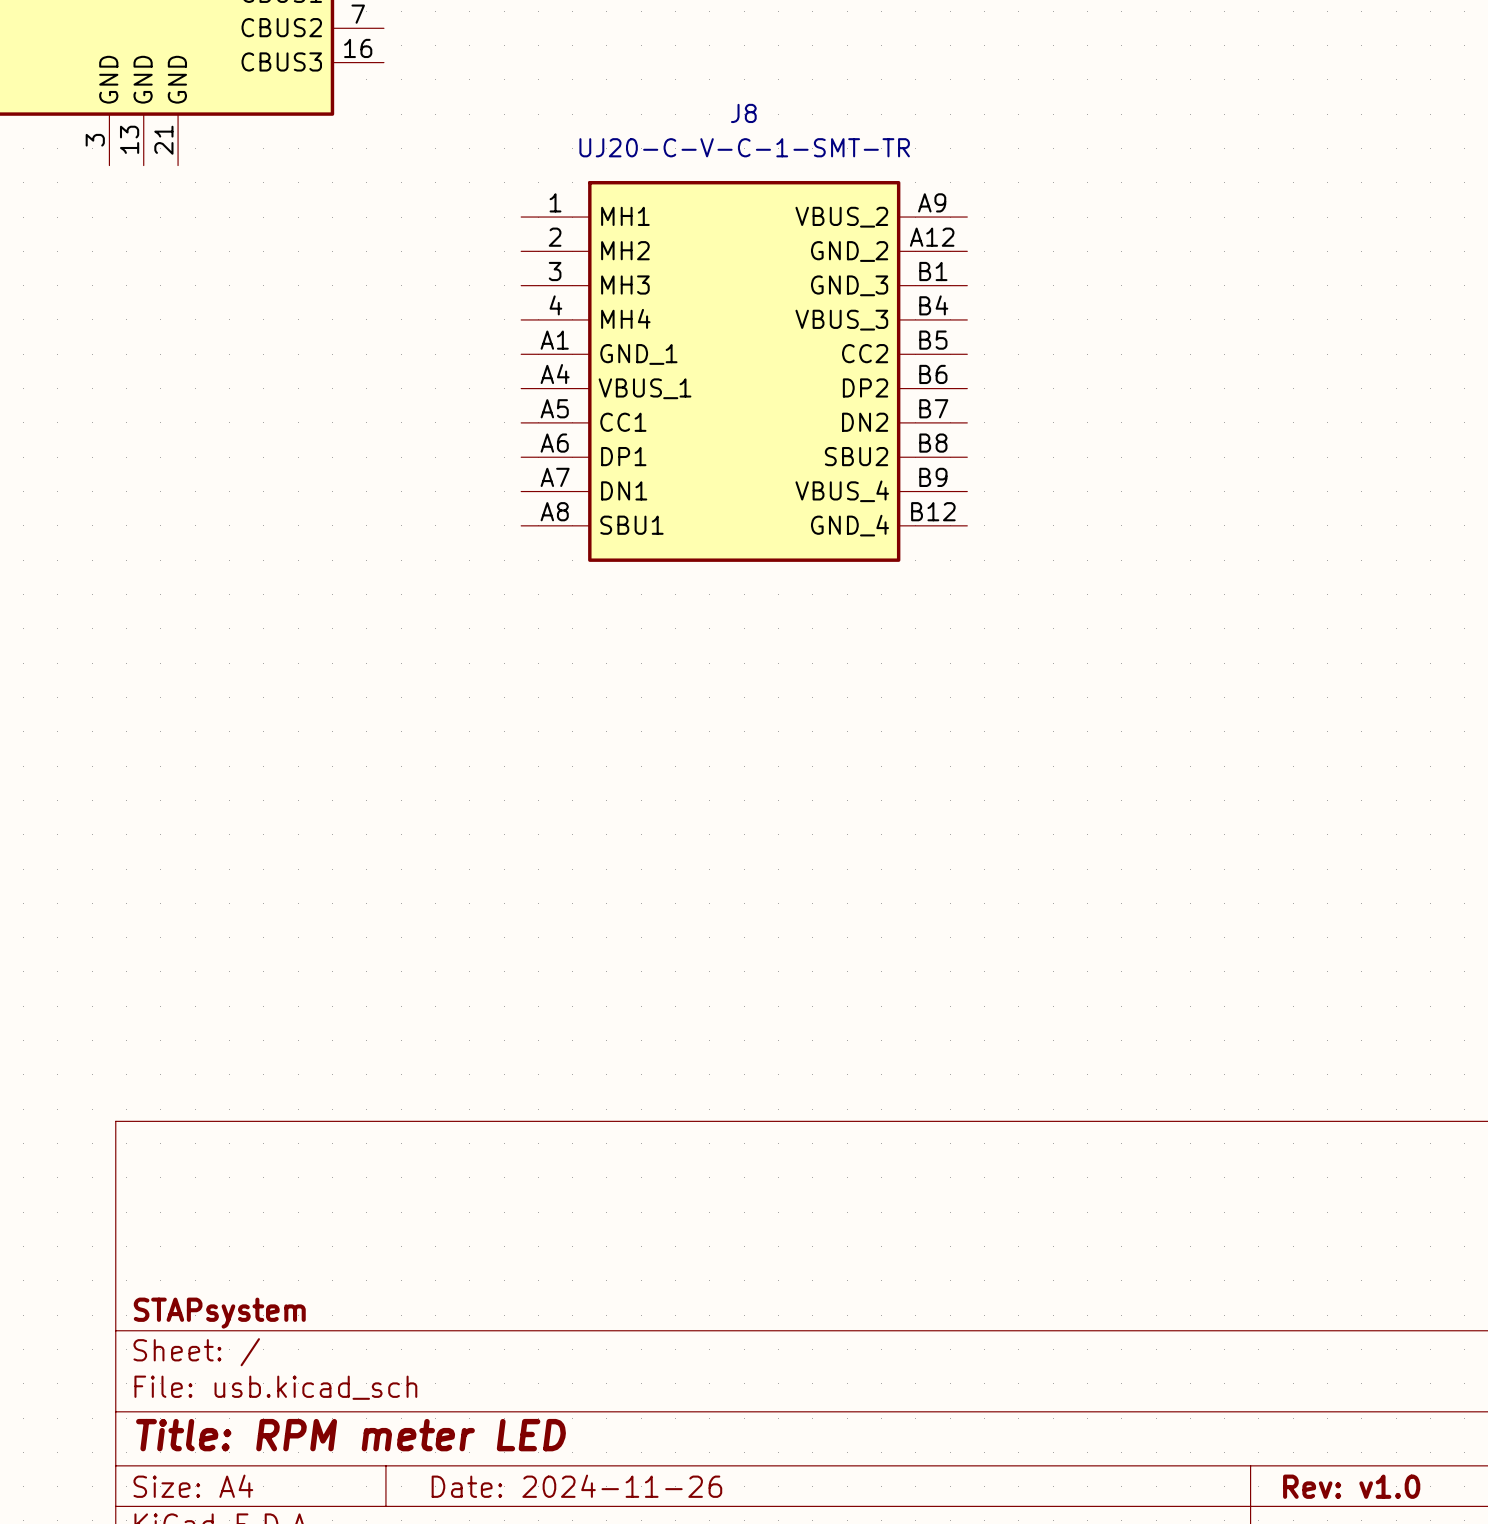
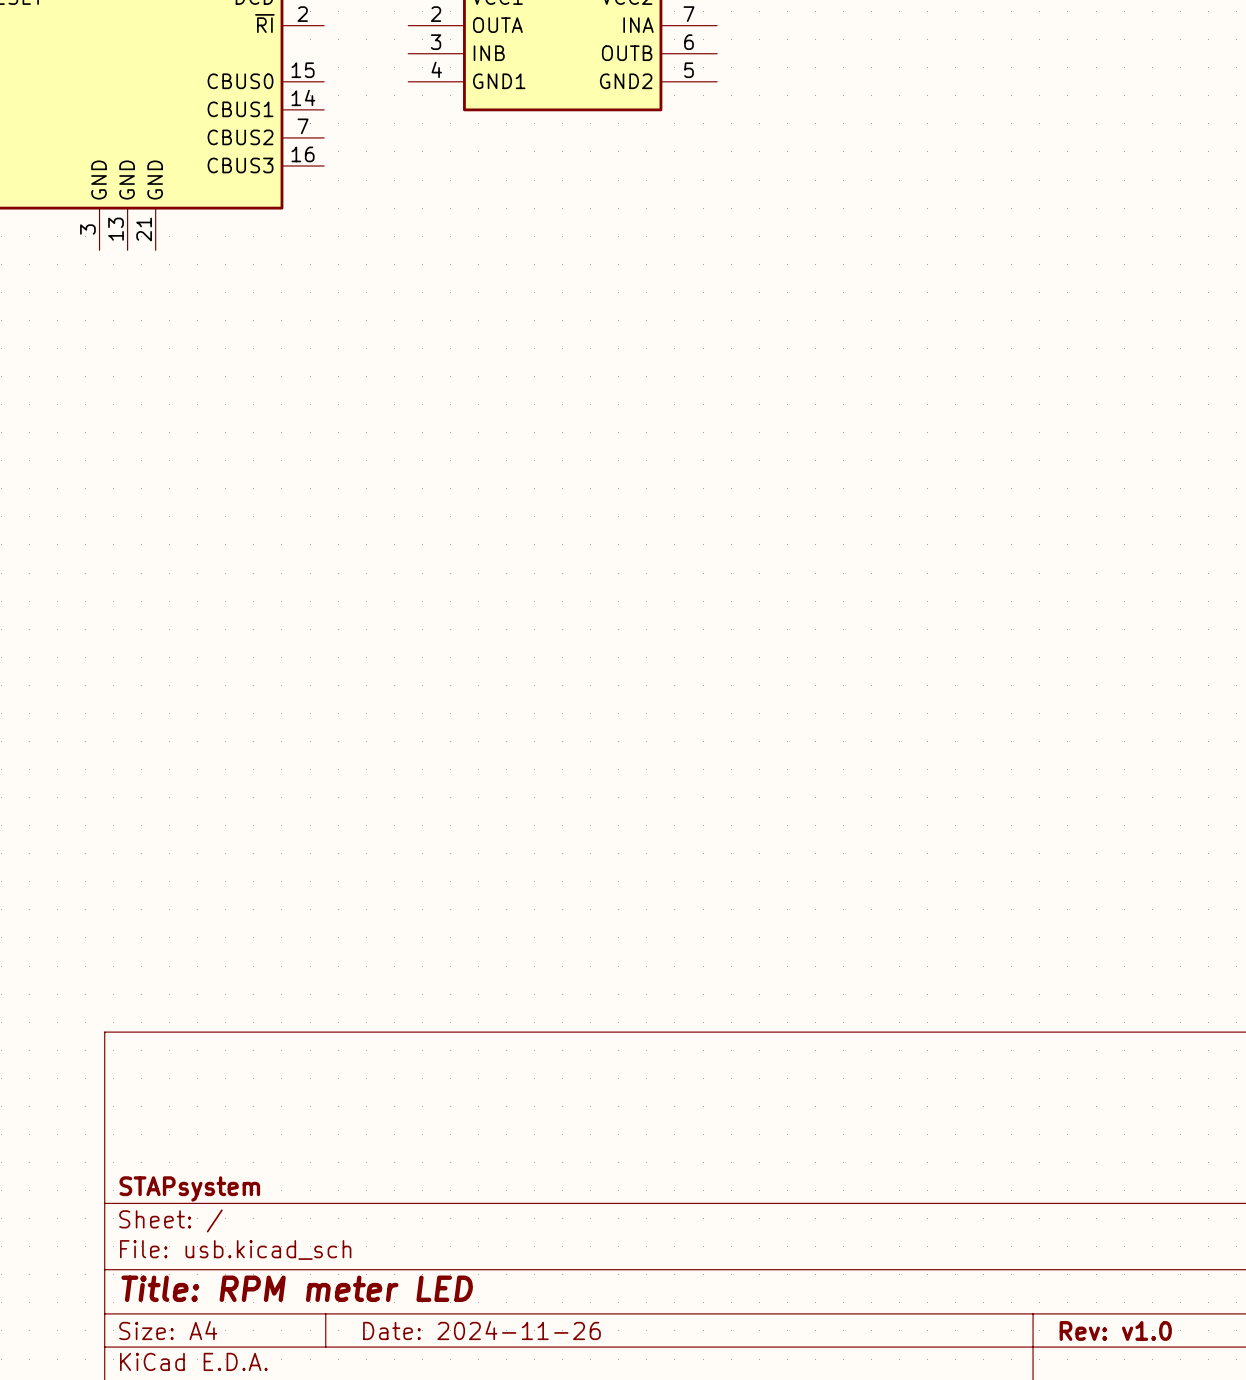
J8: UJ20-C-V-C-1-SMT-TR (744, 371) -> none

